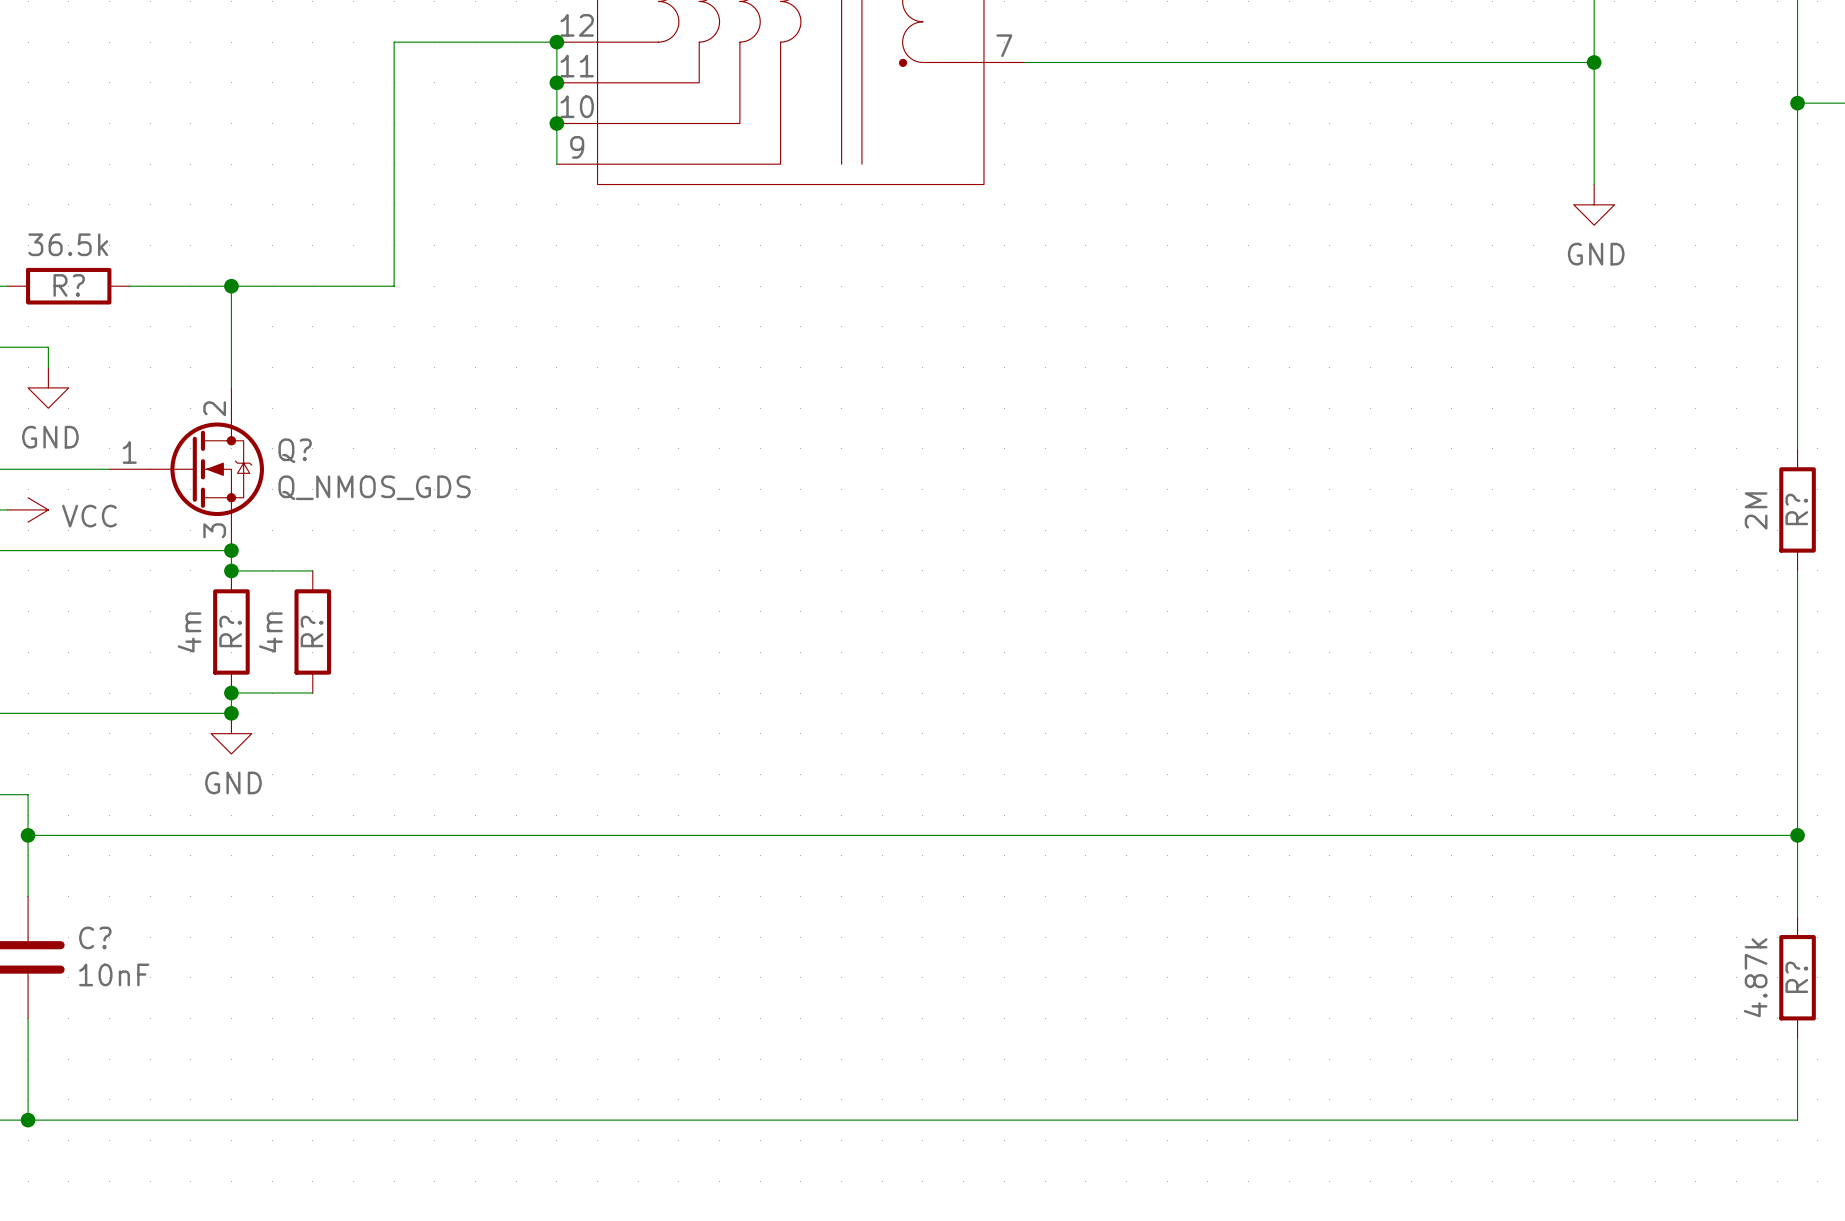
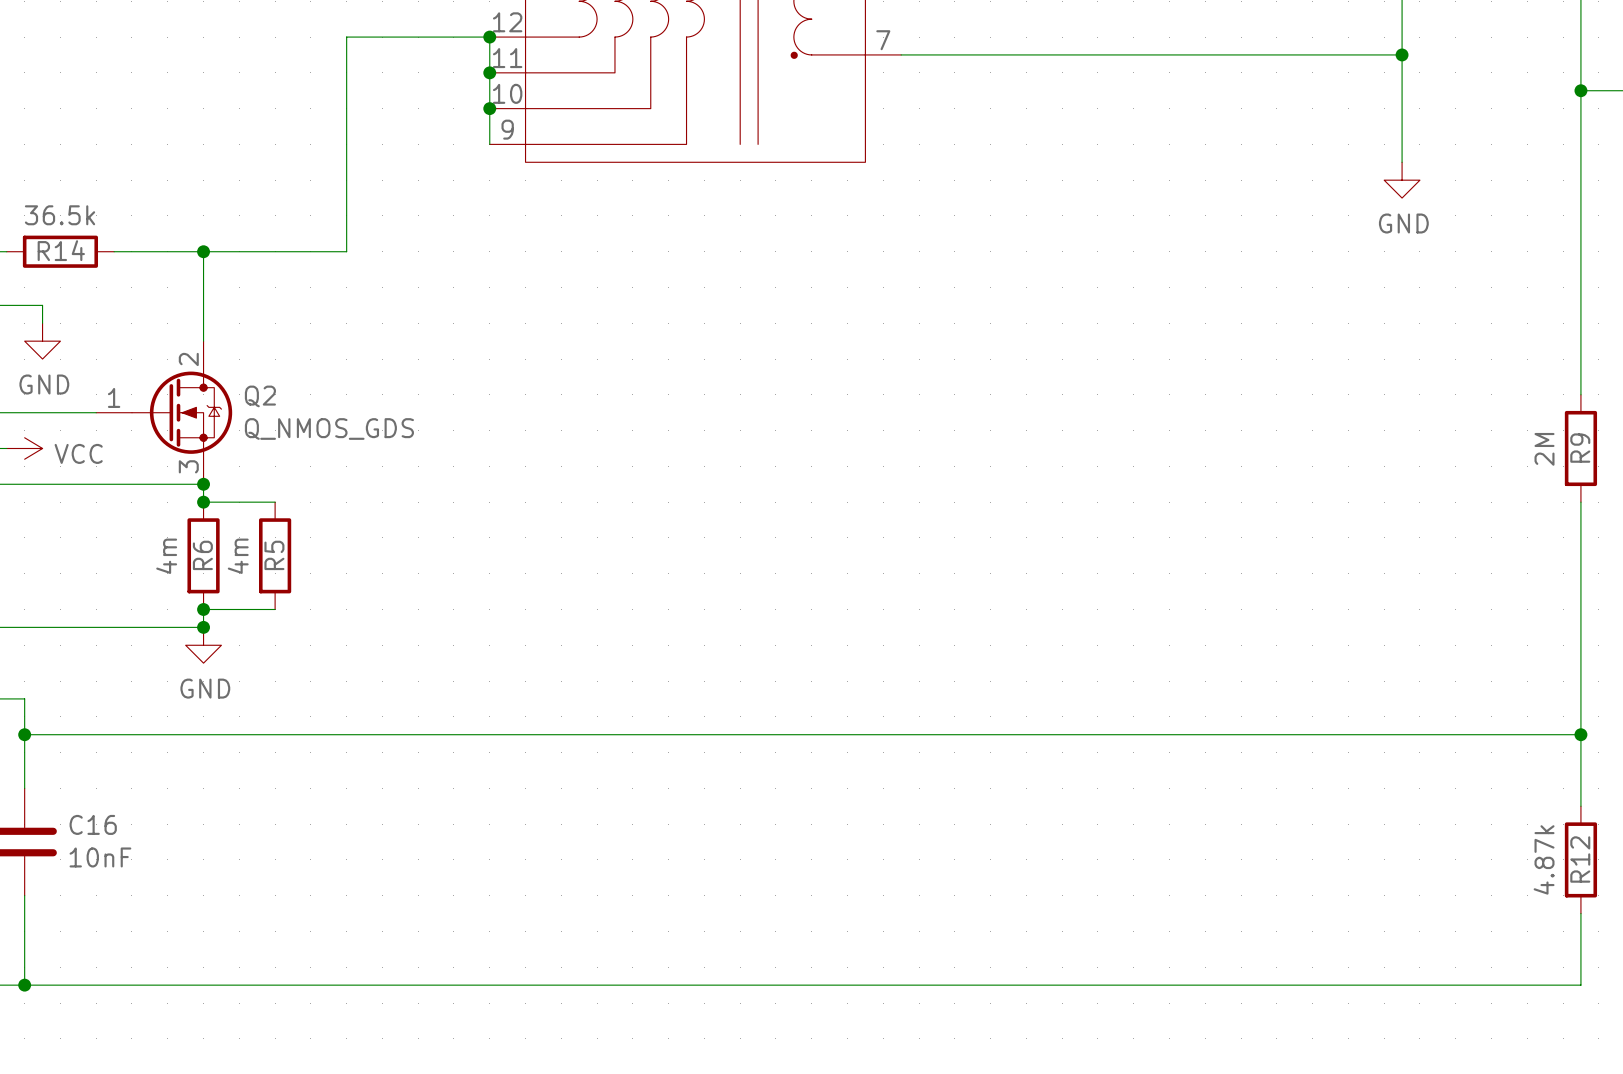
R? name: R? (69, 285) -> R14 (61, 250)
Q? name: Q? (295, 450) -> Q2 (260, 396)
R? name: R? (1796, 509) -> R9 (1580, 448)
R? name: R? (230, 631) -> R6 (202, 555)
R? name: R? (312, 631) -> R5 (274, 555)
C? name: C? (95, 937) -> C16 (93, 824)
R? name: R? (1796, 977) -> R12 (1580, 859)

